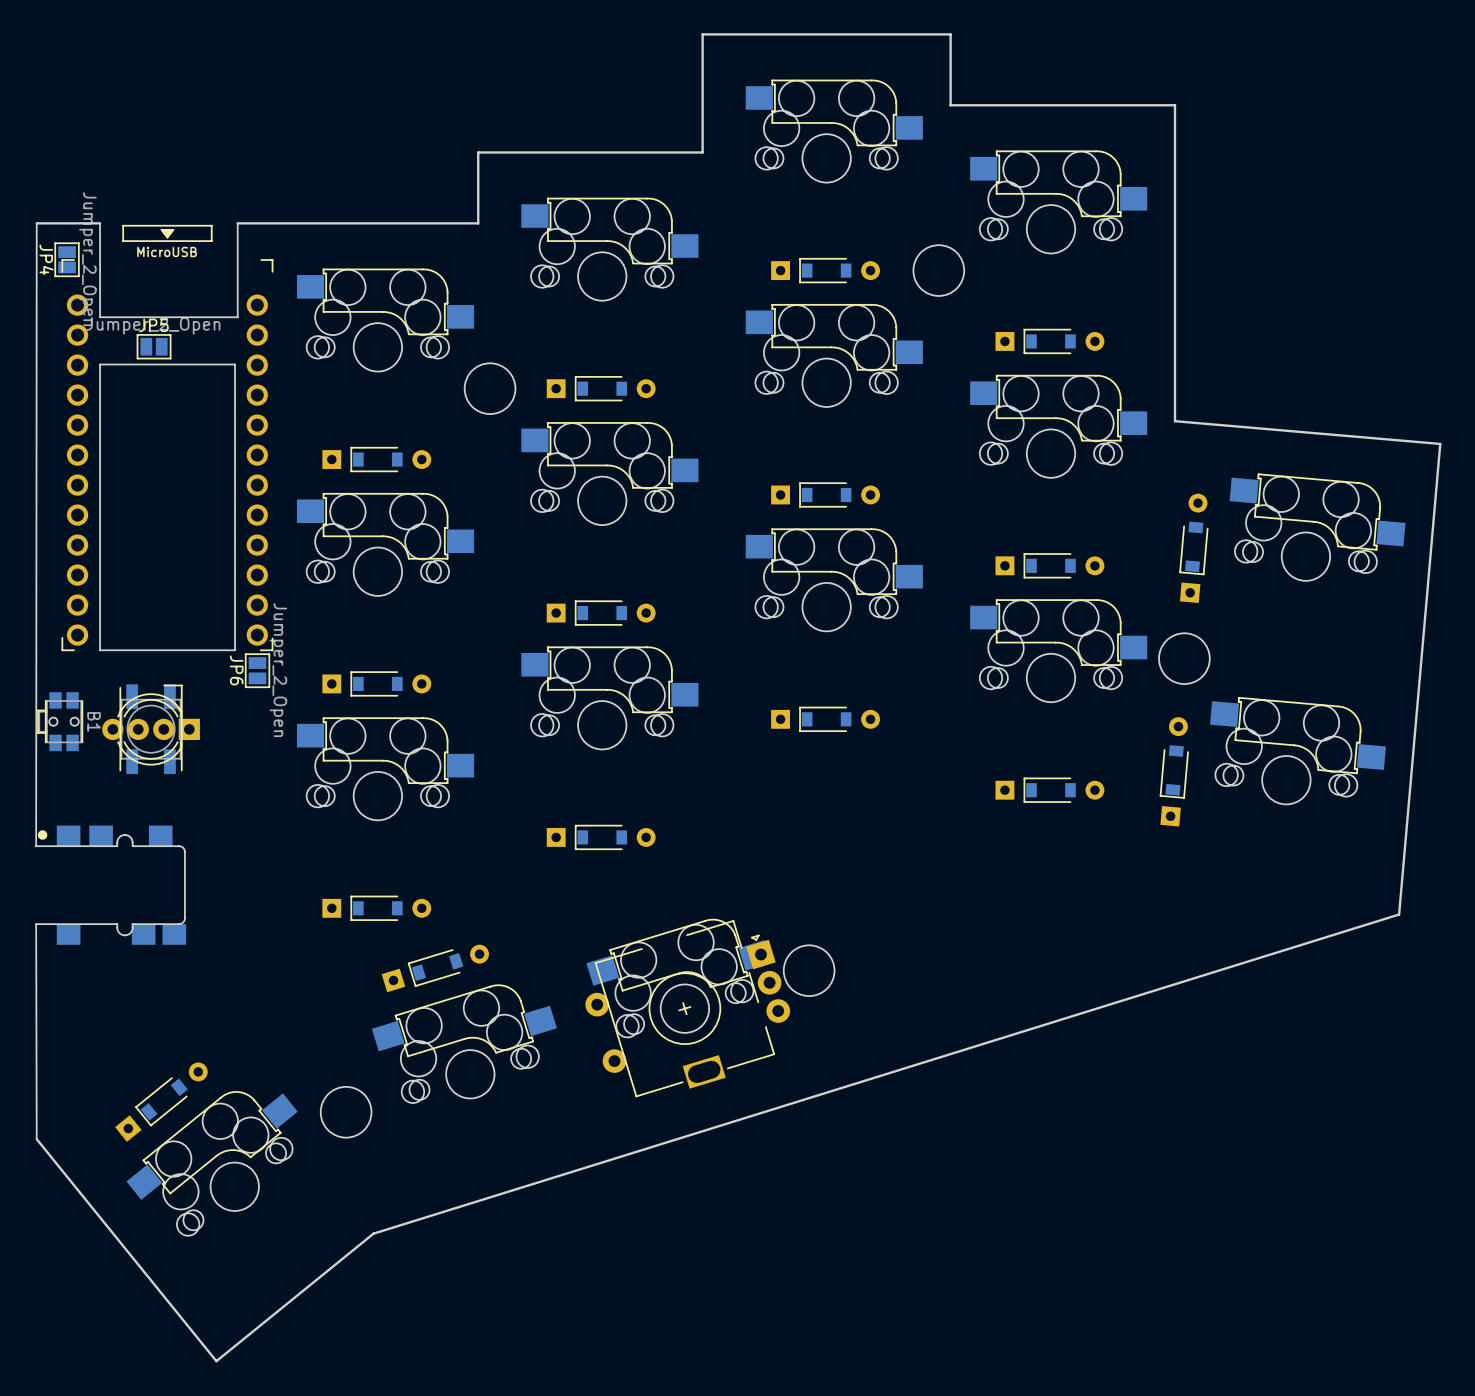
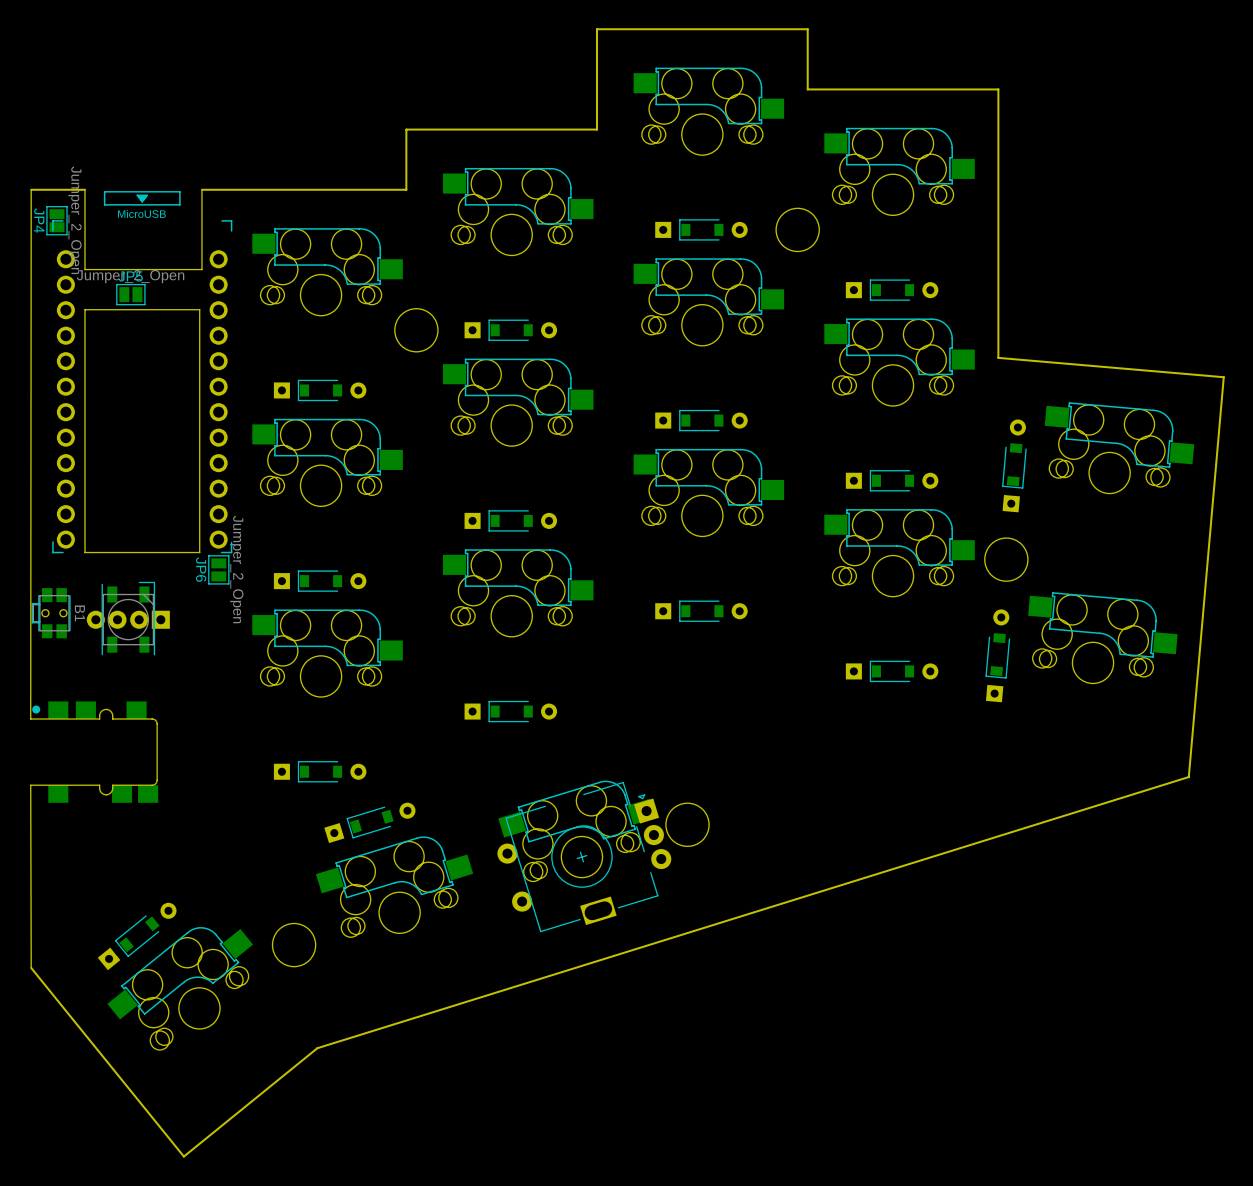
part: none -> (128, 618)
part: (151, 729) -> none
part: (151, 729) -> none
part: none -> (128, 619)

